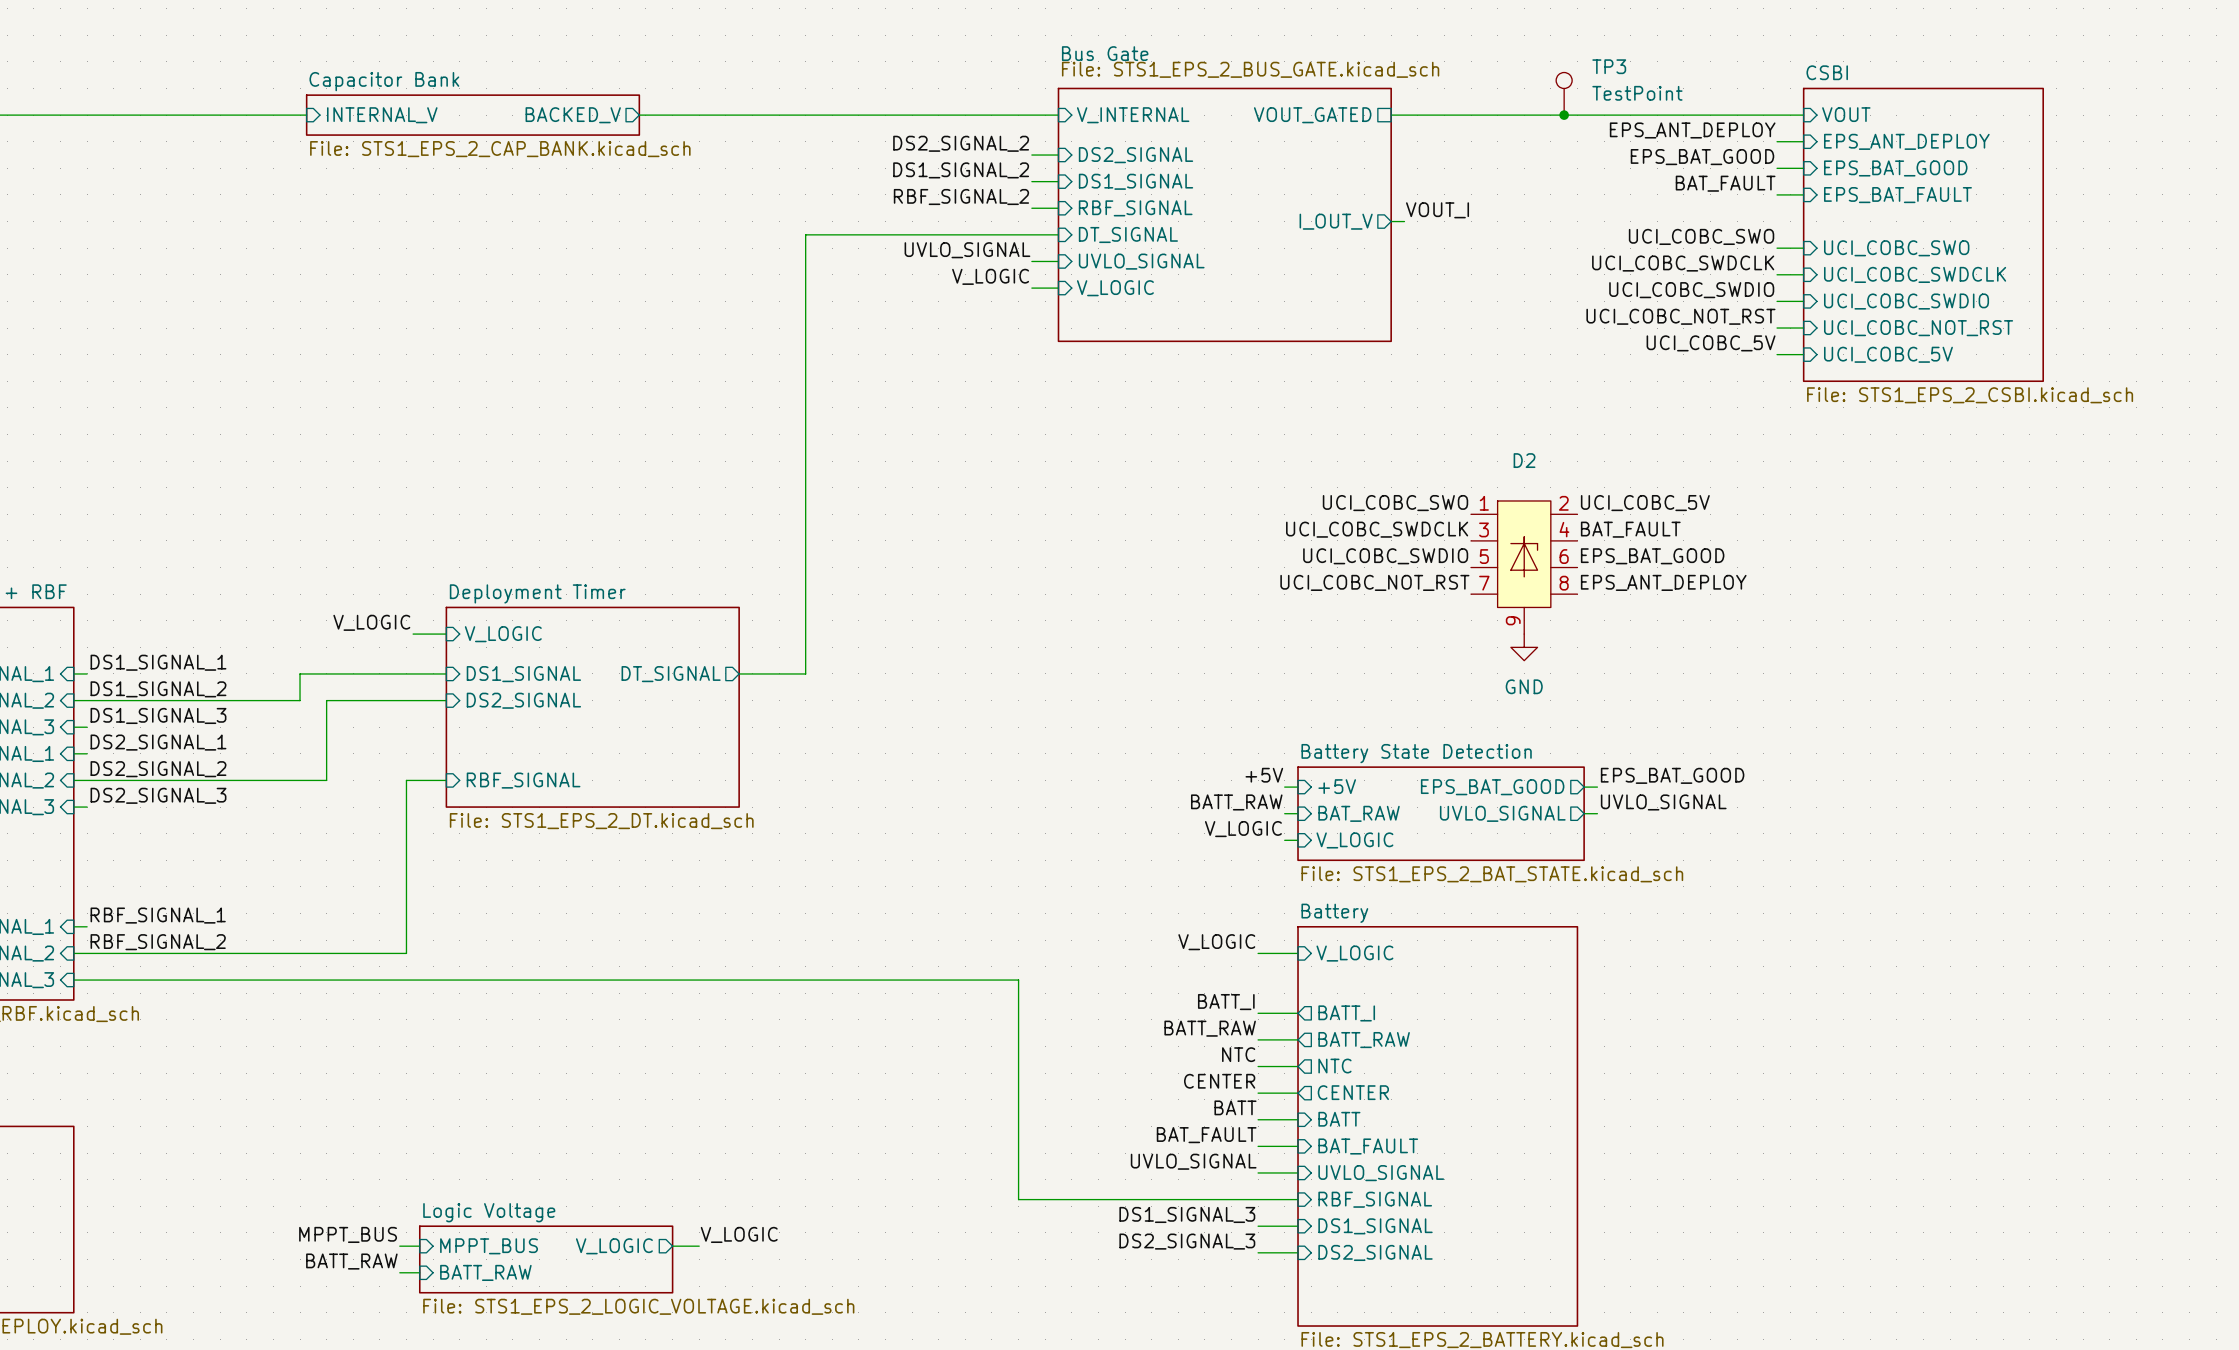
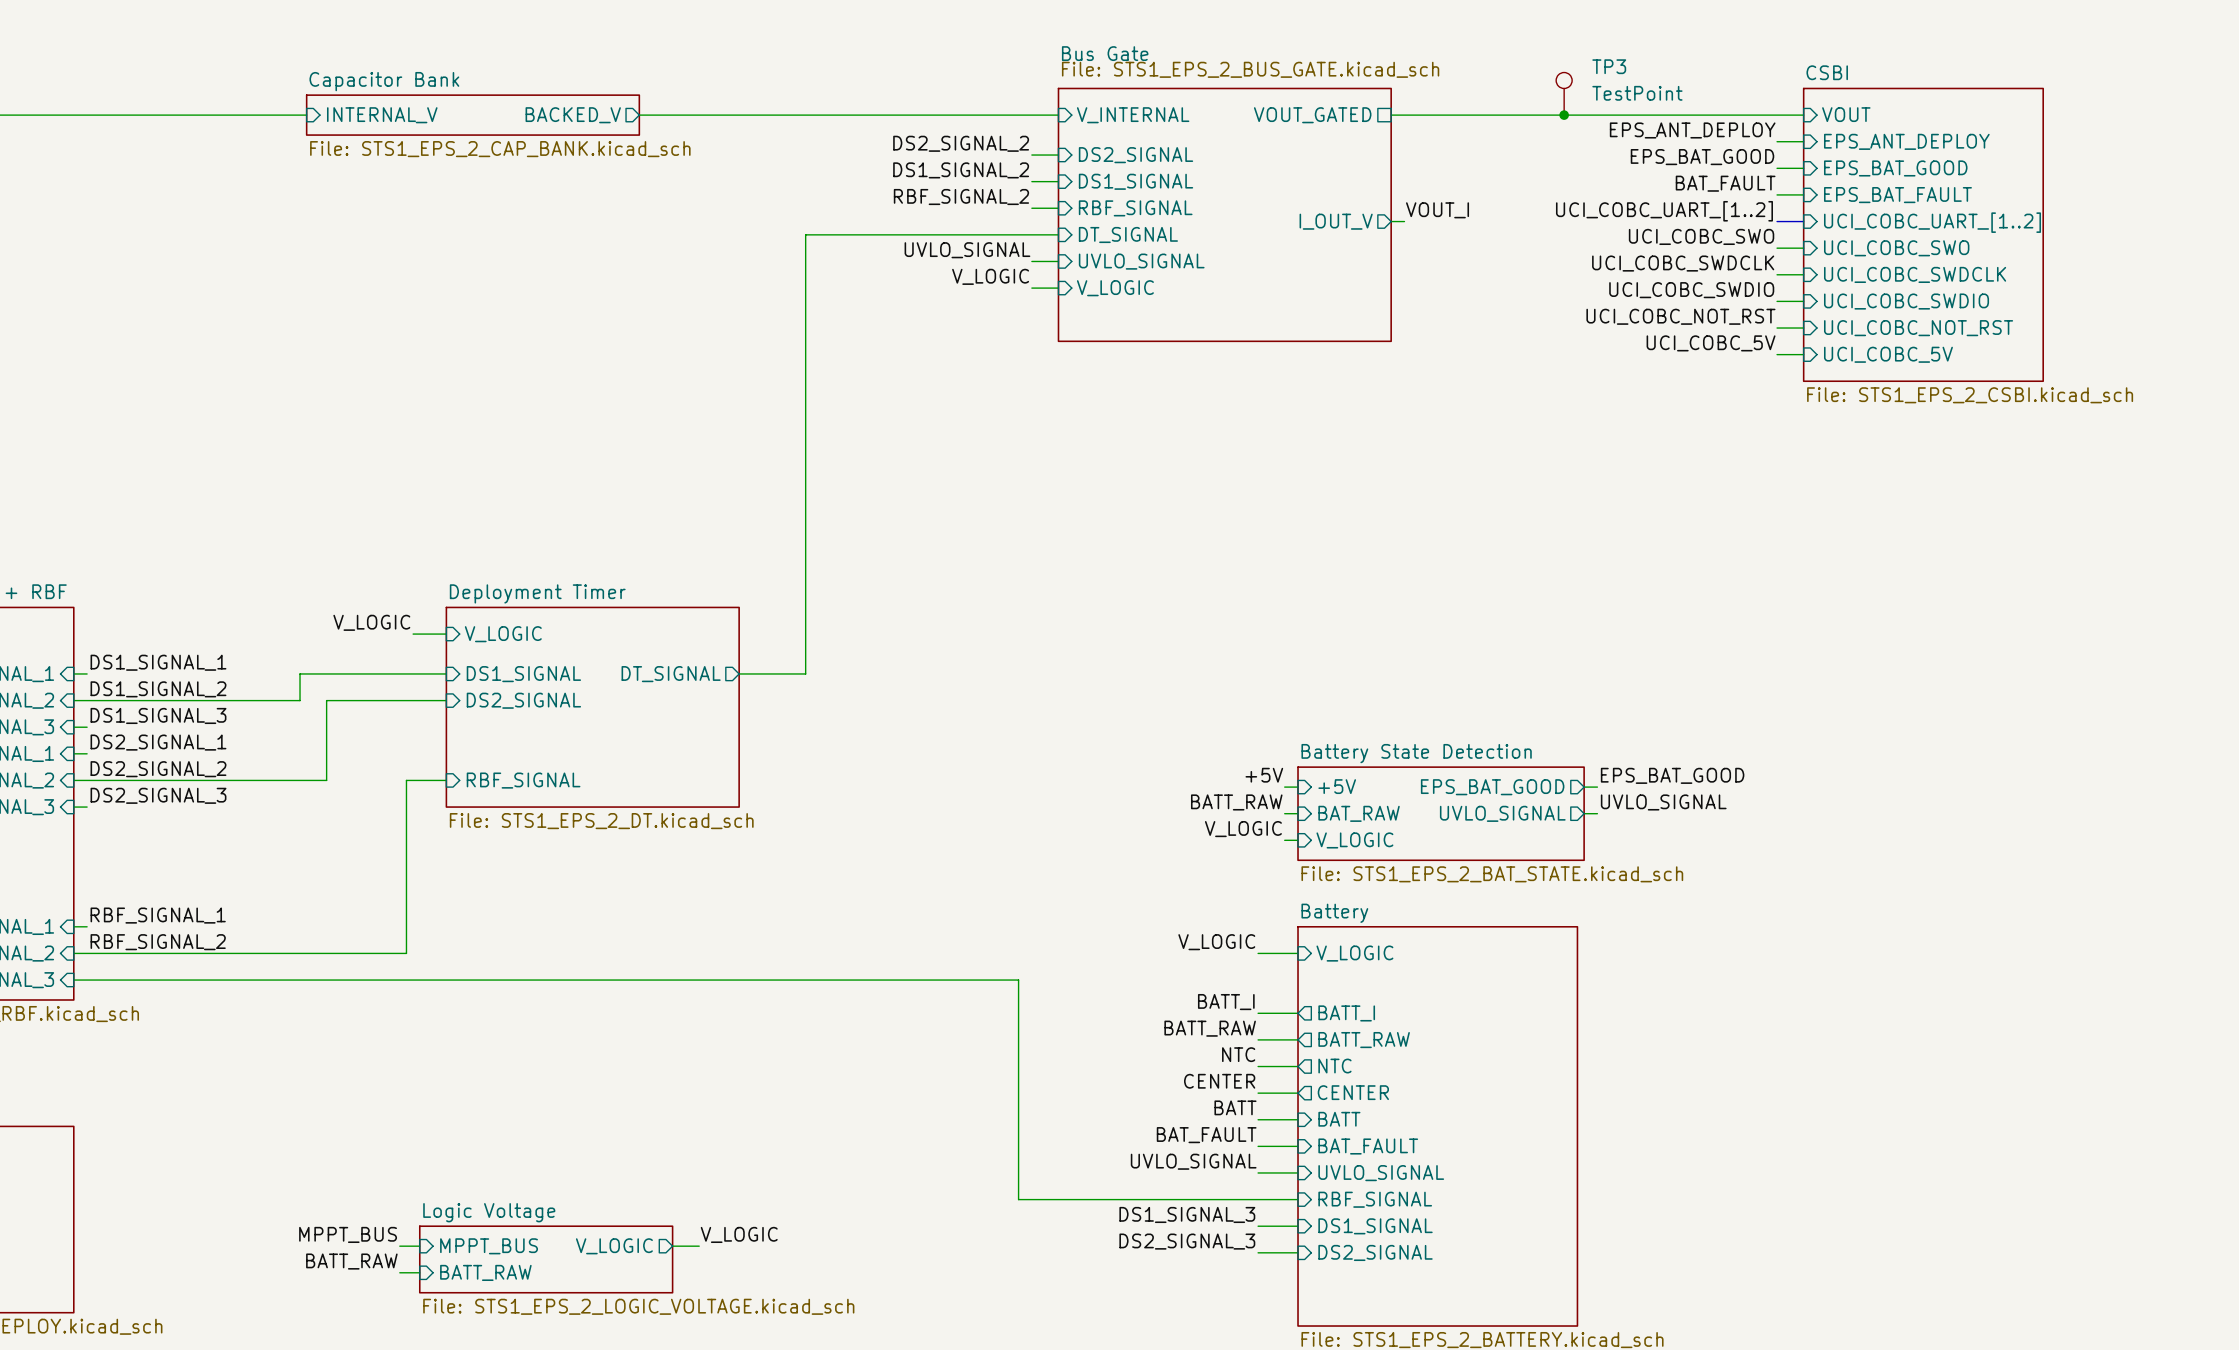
label: none -> UCI_COBC_UART_[1..2] (1664, 211)
bus: none -> (1777, 221) (1803, 221)
sheet pin: none -> UCI_COBC_UART_[1..2] (1932, 222)
label: UCI_COBC_SWO (1395, 503) -> none
label: UCI_COBC_5V (1645, 503) -> none
label: UCI_COBC_SWDCLK (1377, 529) -> none
label: BAT_FAULT (1630, 529) -> none
label: UCI_COBC_SWDIO (1385, 556) -> none
label: EPS_BAT_GOOD (1652, 556) -> none
D2: (1524, 567) -> none
label: UCI_COBC_NOT_RST (1374, 582) -> none
label: EPS_ANT_DEPLOY (1663, 582) -> none
power symbol: GND (1524, 647) -> none

